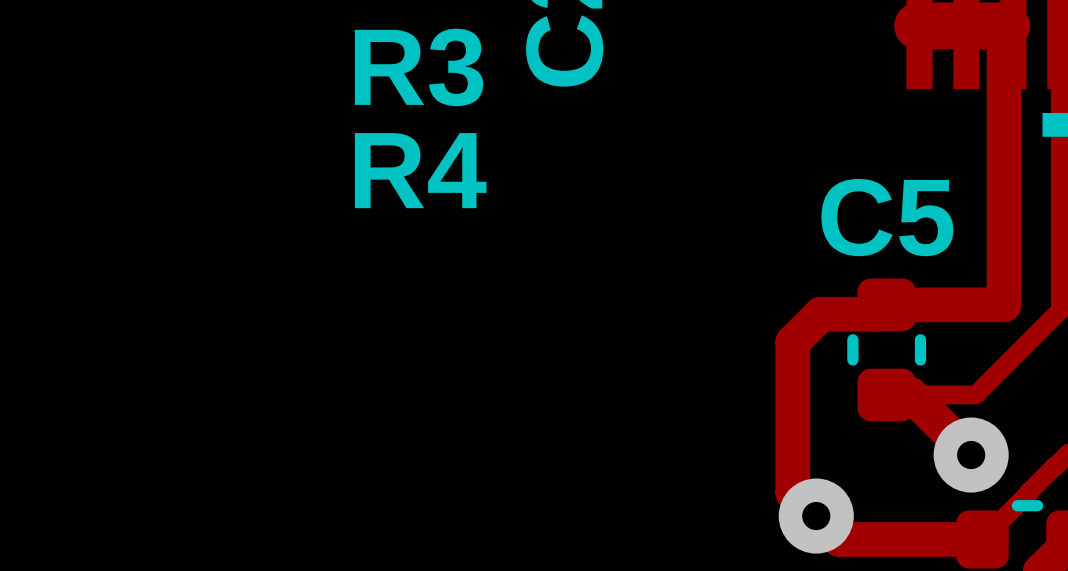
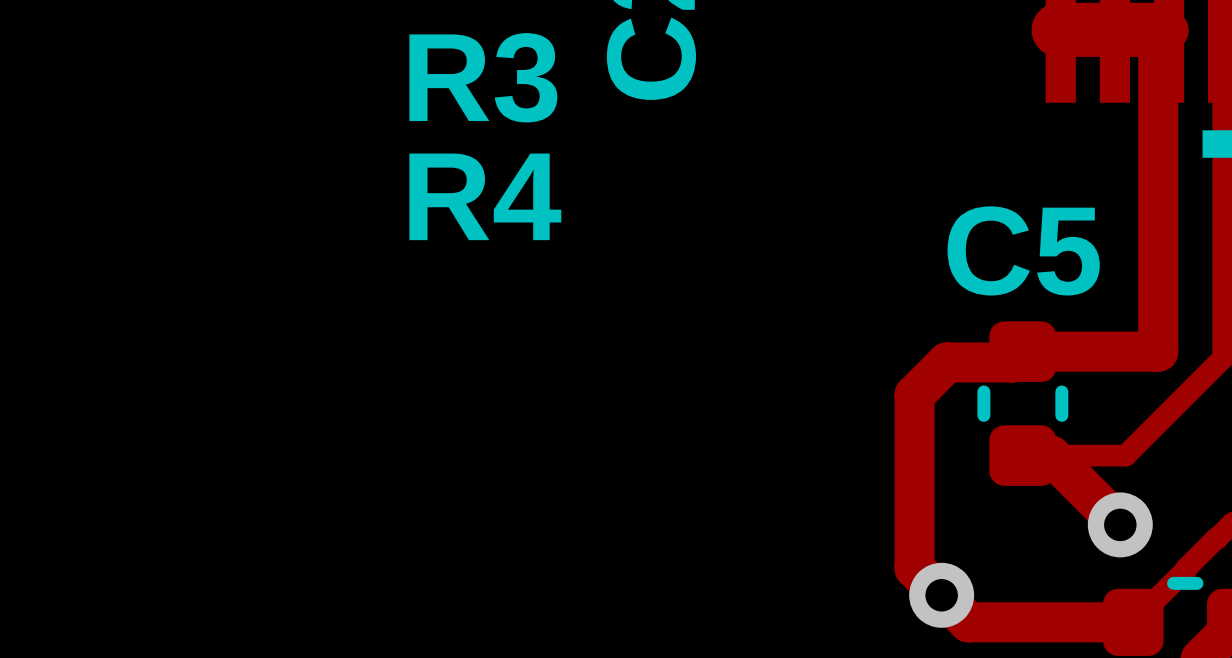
via size: [933, 417, 1009, 493] -> [1087, 492, 1153, 558]
via size: [778, 478, 854, 554] -> [909, 562, 975, 628]

